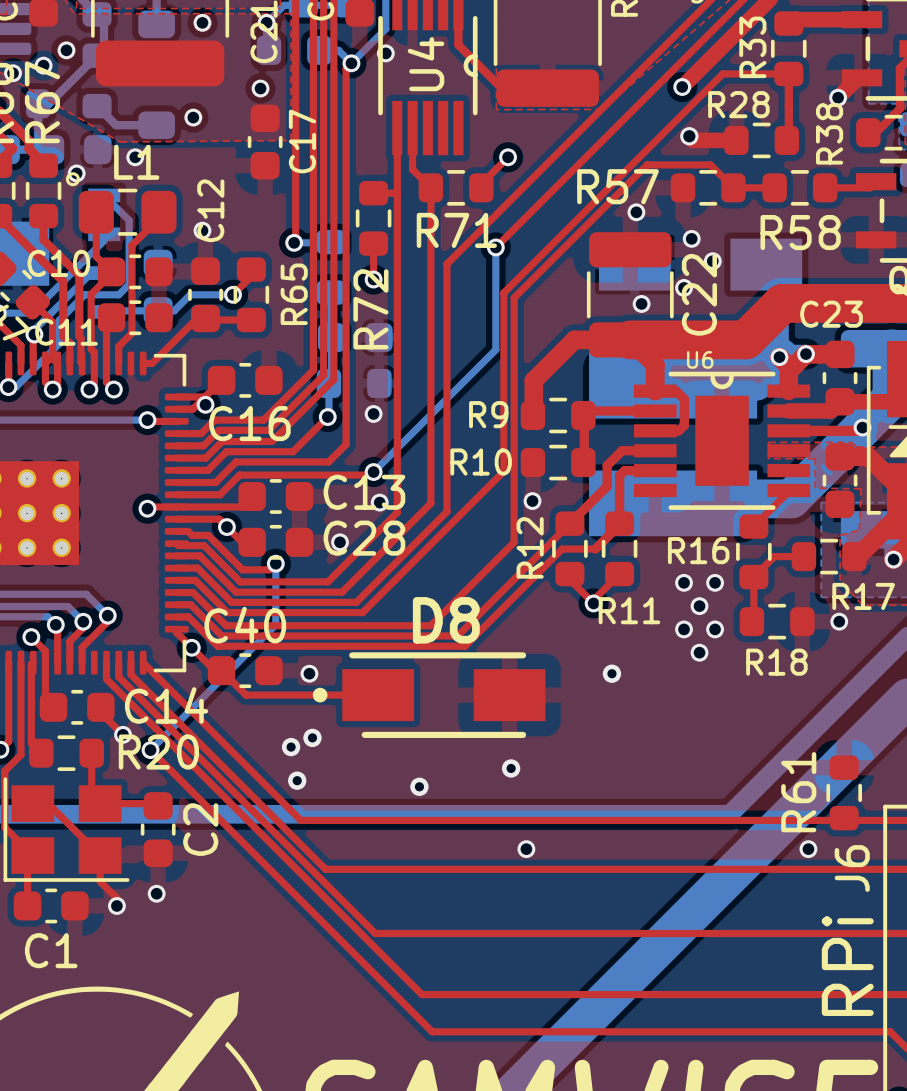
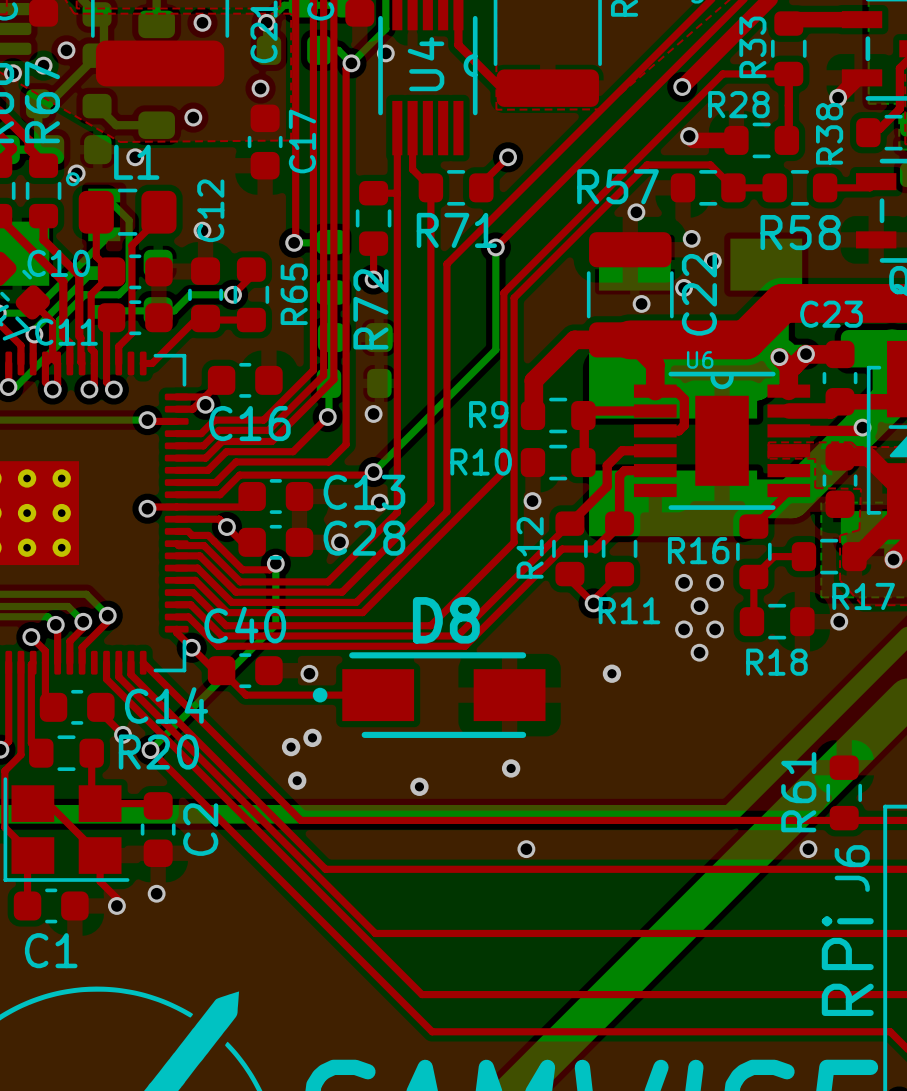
round board edge: [20, 471, 34, 486] -> none
round board edge: [54, 471, 69, 486] -> none
round board edge: [20, 506, 34, 521] -> none
round board edge: [54, 506, 69, 521] -> none
round board edge: [20, 541, 34, 555] -> none
round board edge: [54, 541, 69, 555] -> none

